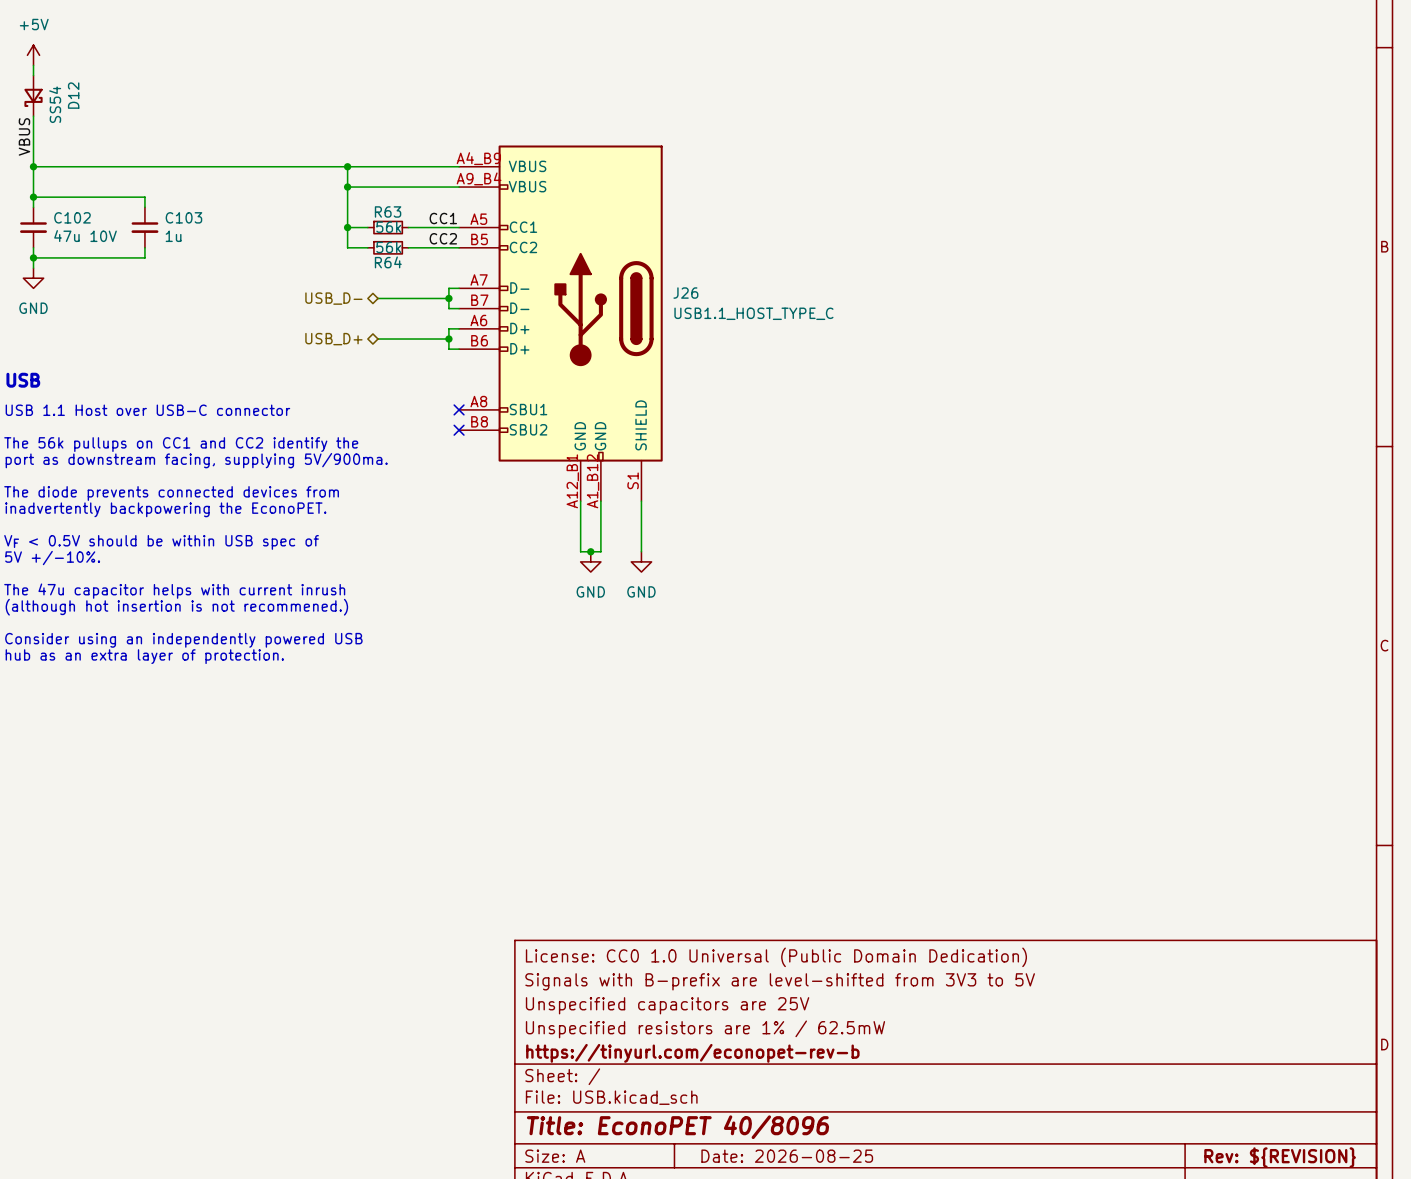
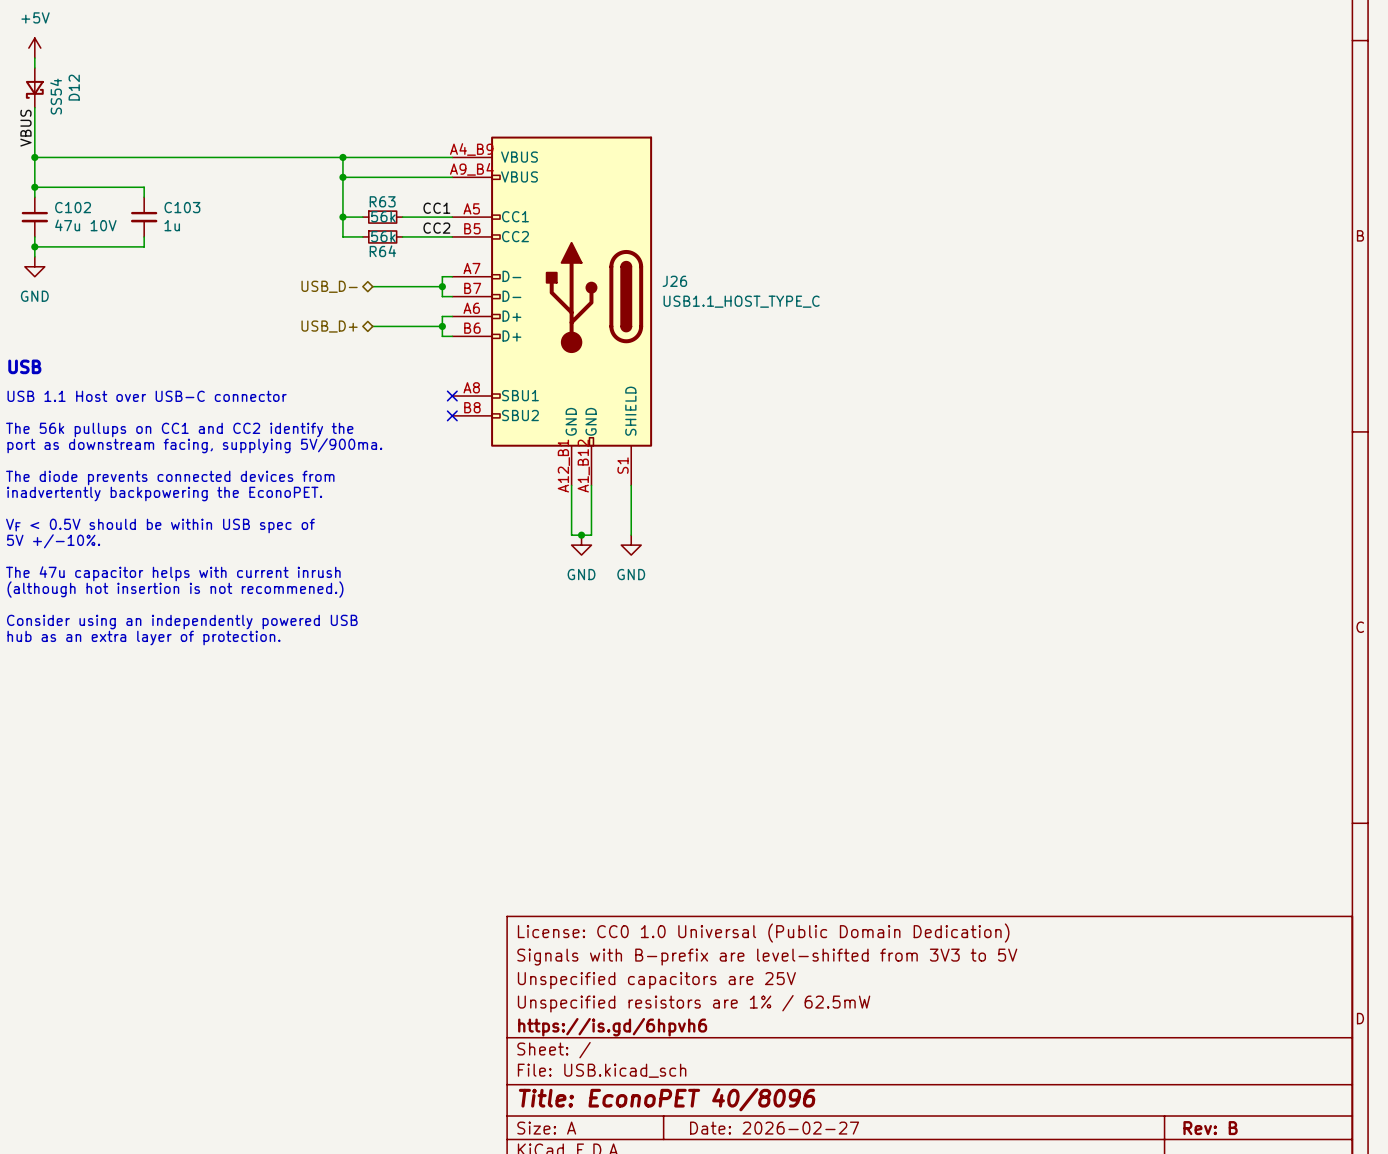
title block: https://tinyurl.com/econopet-rev-b (692, 1053) -> https://is.gd/6hpvh6 (612, 1027)
title block: Date: 2026-08-25 (787, 1156) -> Date: 2026-02-27 (774, 1128)
title block: Rev: ${REVISION} (1280, 1157) -> Rev: B (1210, 1128)

